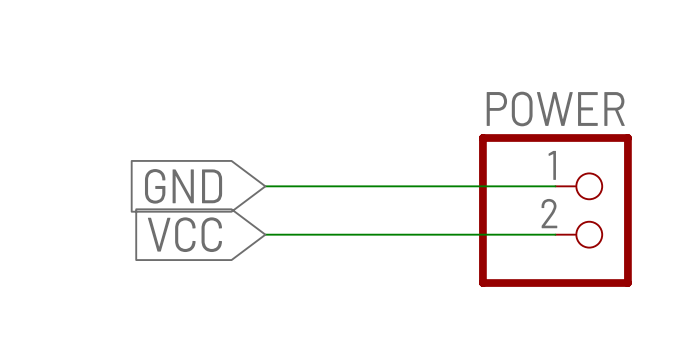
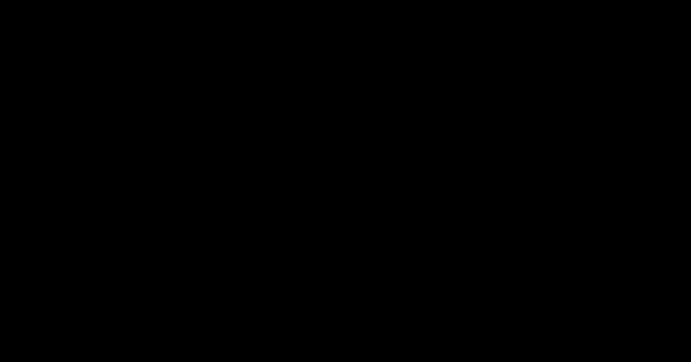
global label: GND (183, 186) -> none
wire: (265, 186) (555, 186) -> none
POWER: (555, 210) -> none
global label: VCC (184, 234) -> none
wire: (265, 234) (555, 234) -> none

